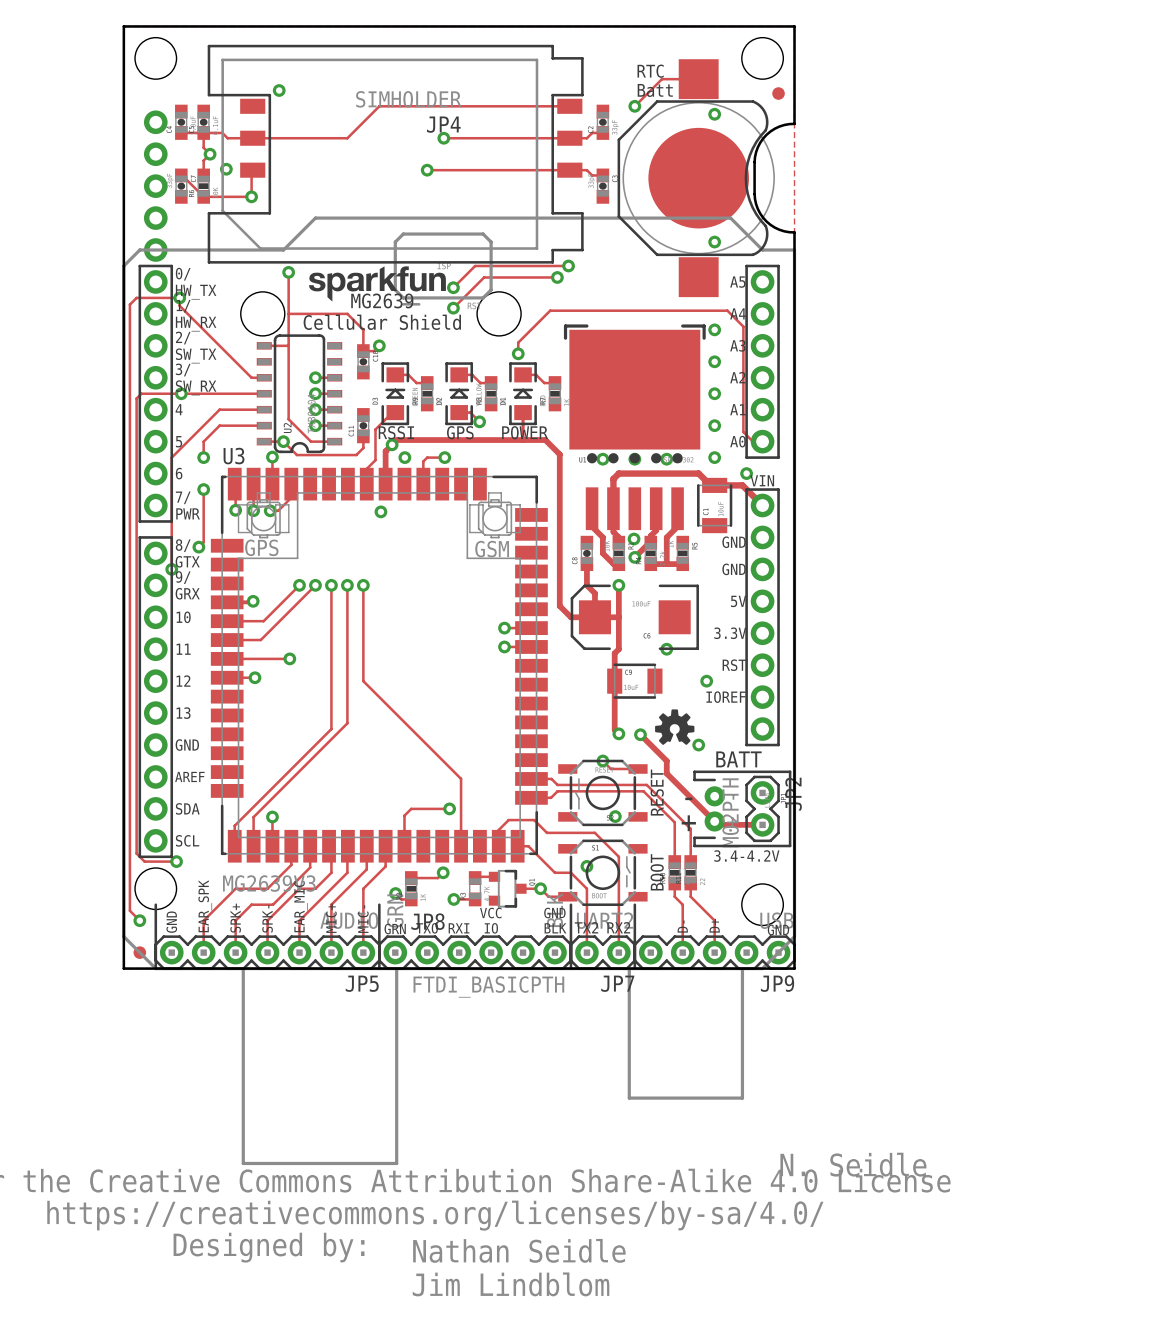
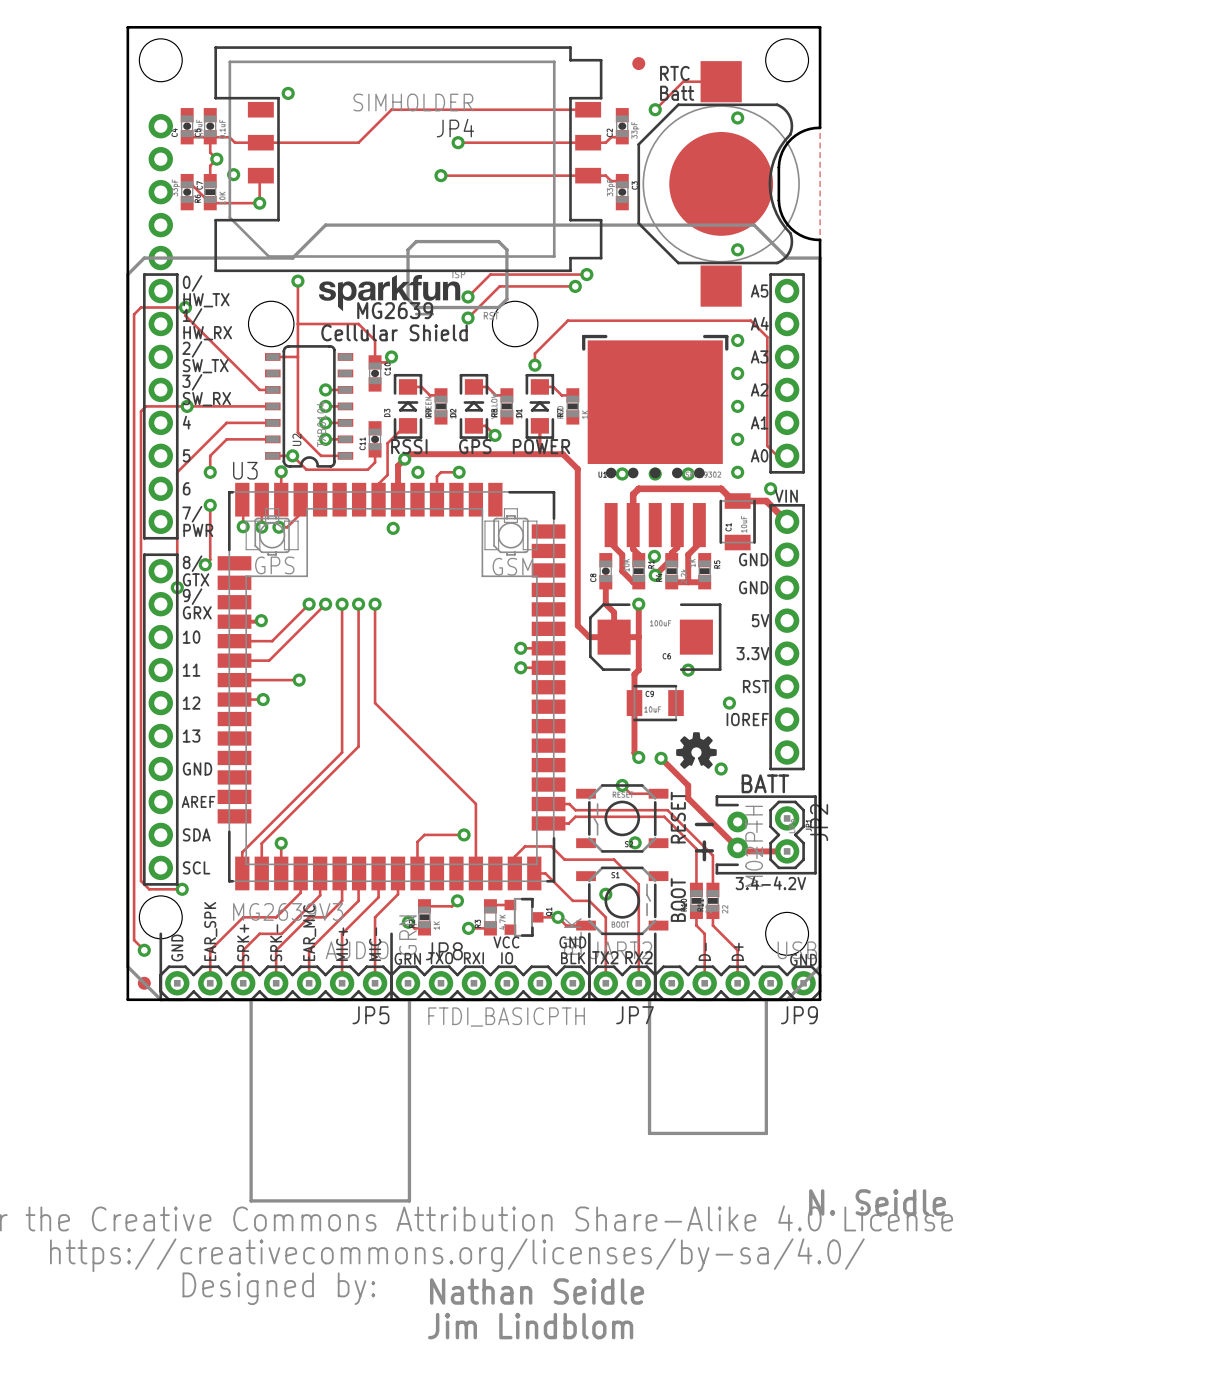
part position: (778, 93) -> (638, 63)

